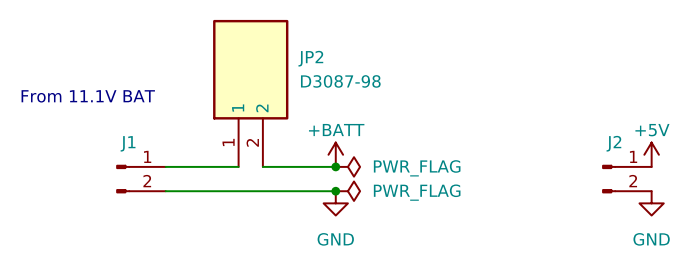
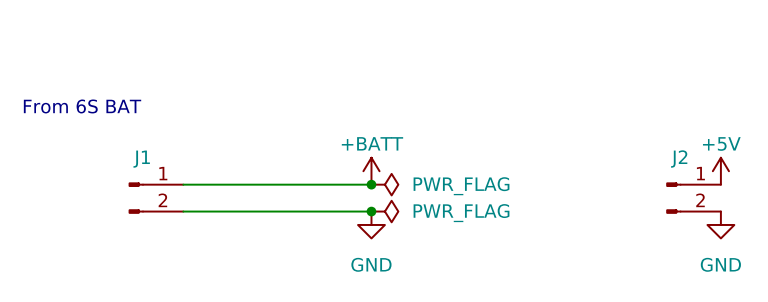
JP2: D3087-98 (250, 93) -> none
text: From 11.1V BAT (88, 96) -> From 6S BAT (82, 106)
wire: none -> (263, 184) (290, 184)

